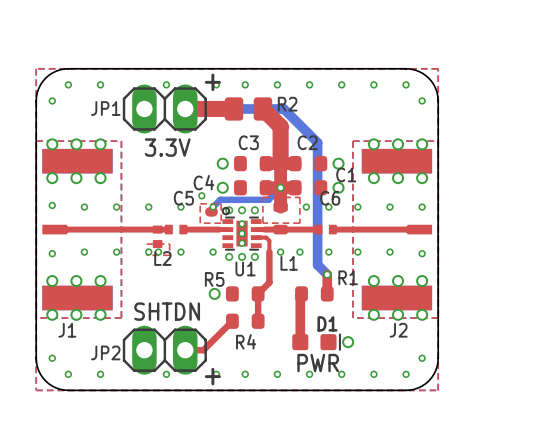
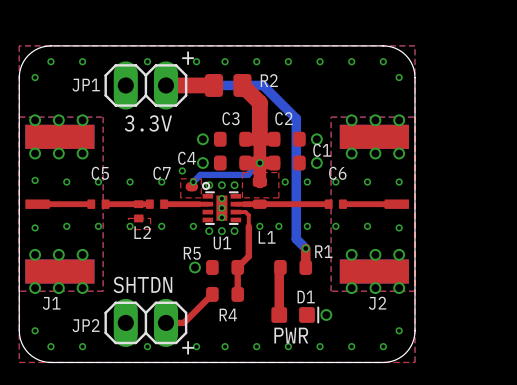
C5 name: C5 (183, 198) -> C7 (162, 173)
top track: (109, 229) (123, 229) -> none
C5: none -> (98, 204)
C6 position: (325, 229) -> (335, 204)
top track: (350, 229) (365, 229) -> (297, 204) (311, 204)
via: (158, 252) -> none

